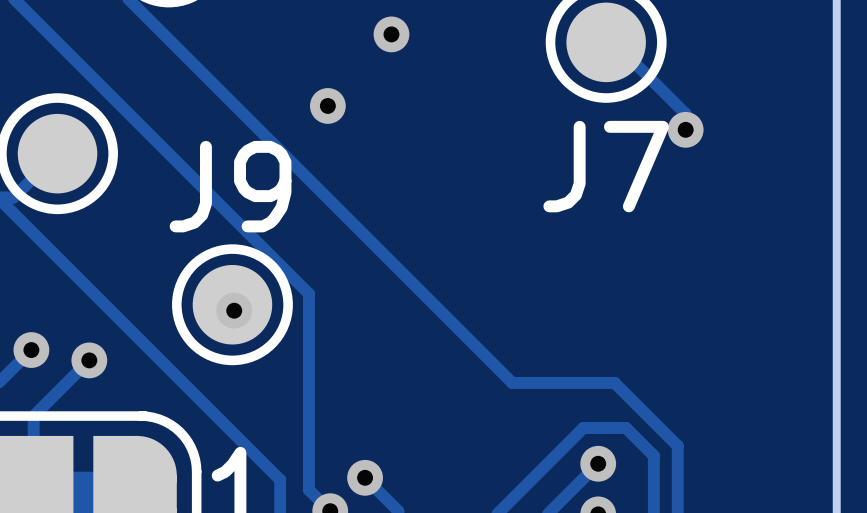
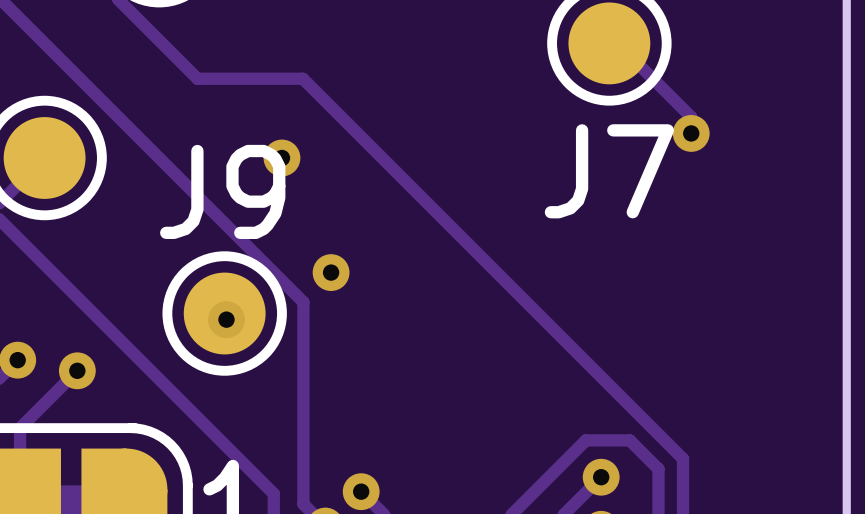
via: (391, 34) -> none
track: (206, 76) (512, 382) (614, 382) -> (197, 78) (302, 78) (618, 393)
via position: (327, 105) -> (281, 158)
via: none -> (331, 272)

